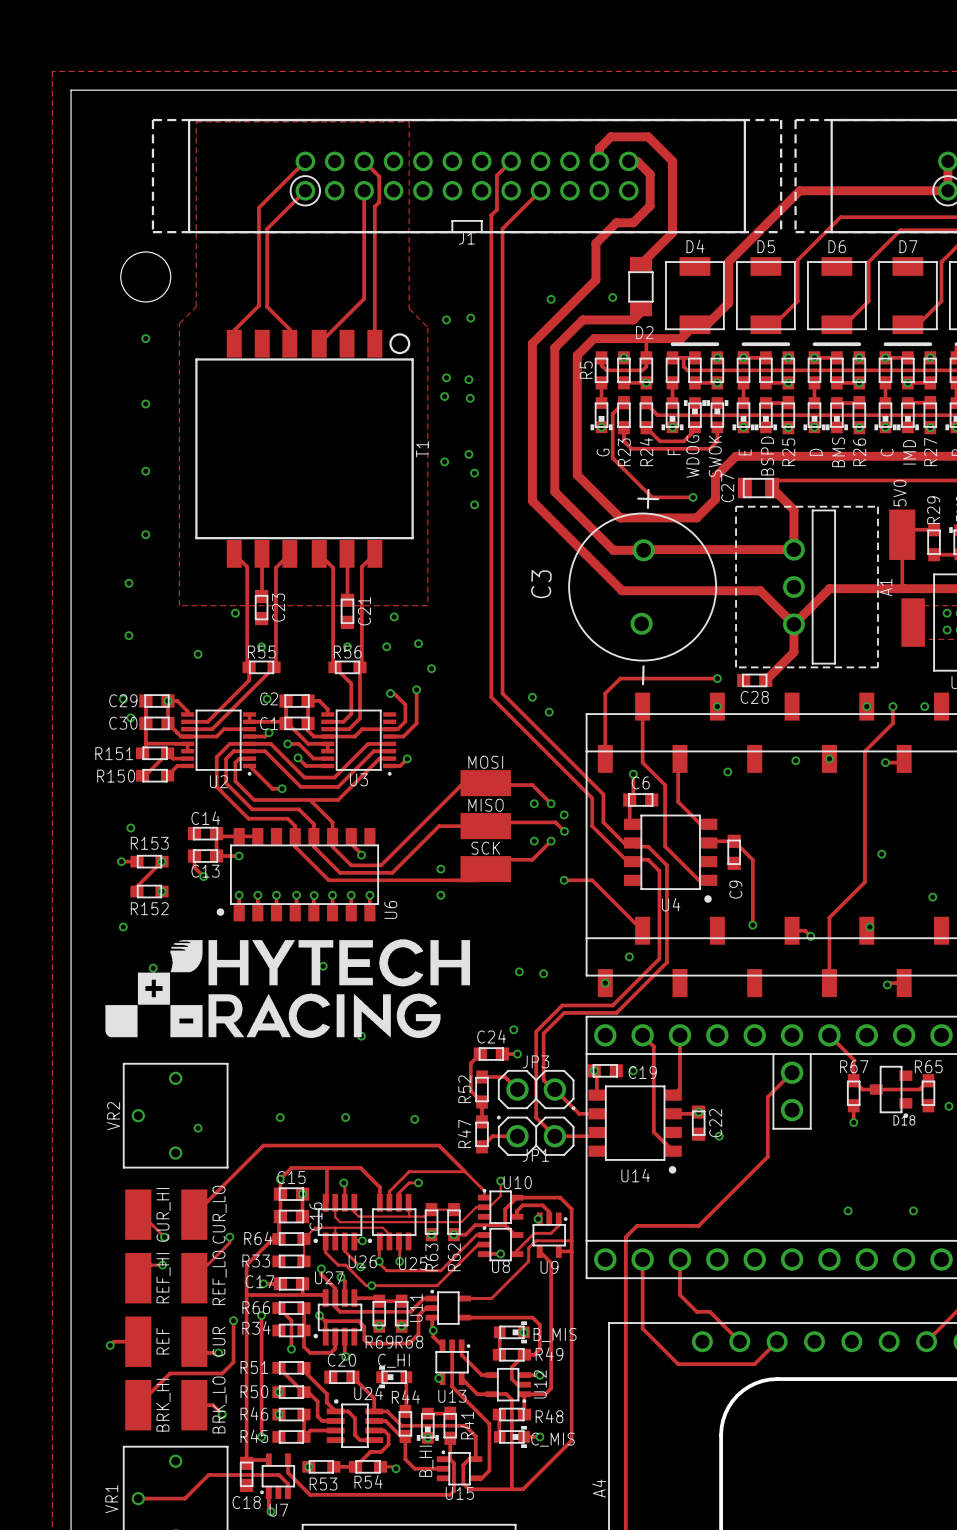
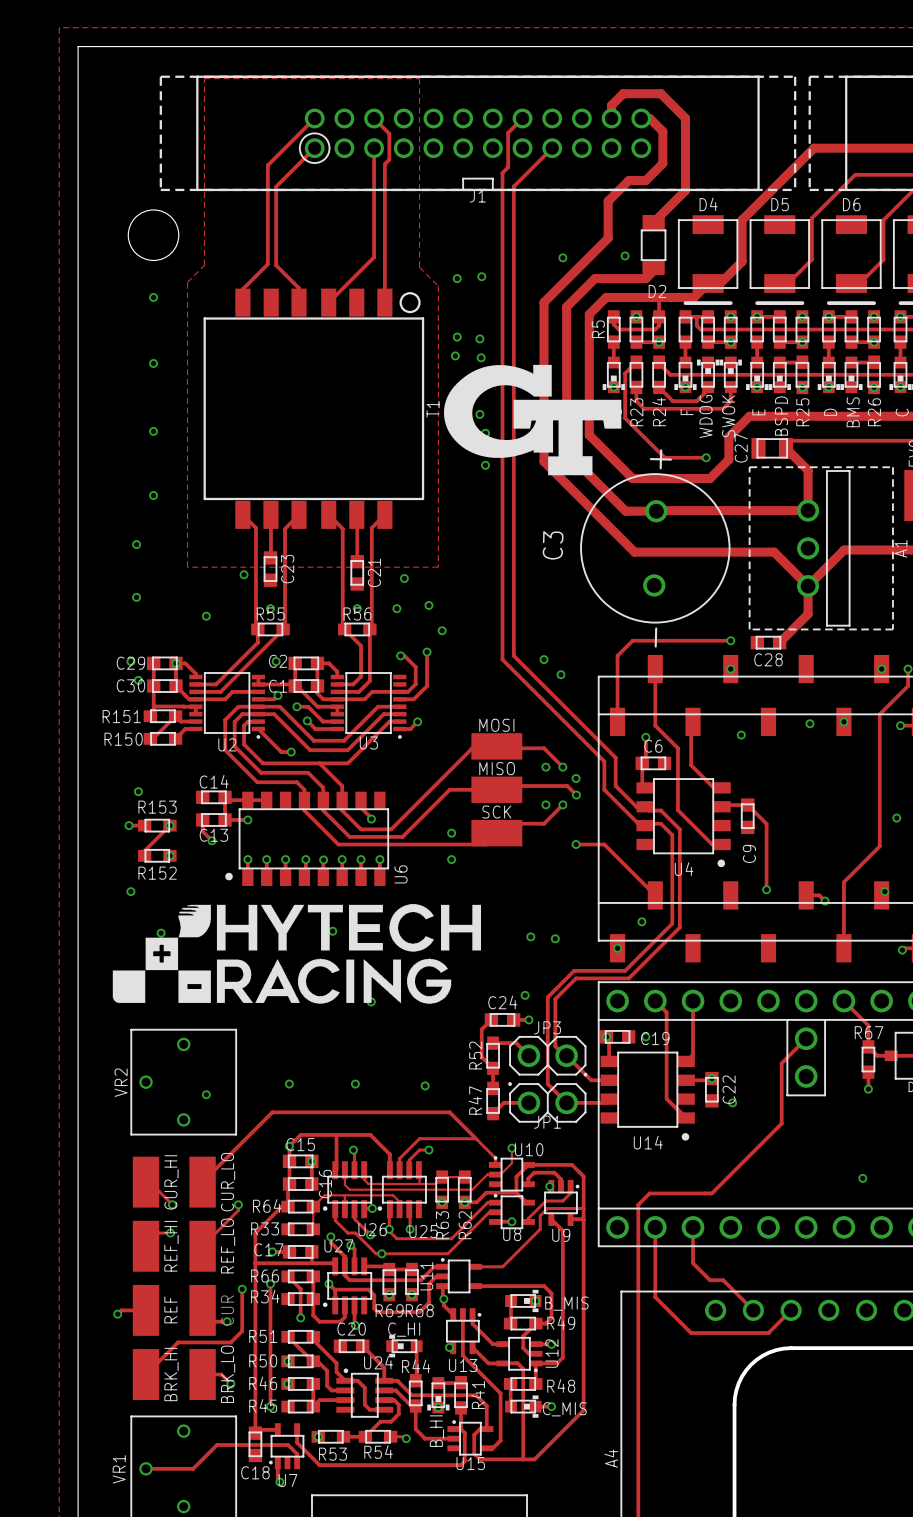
drawing: none -> [444, 364, 622, 476]
CUR text: none -> CUR (227, 1310)
CUR name: CUR (218, 1341) -> none

